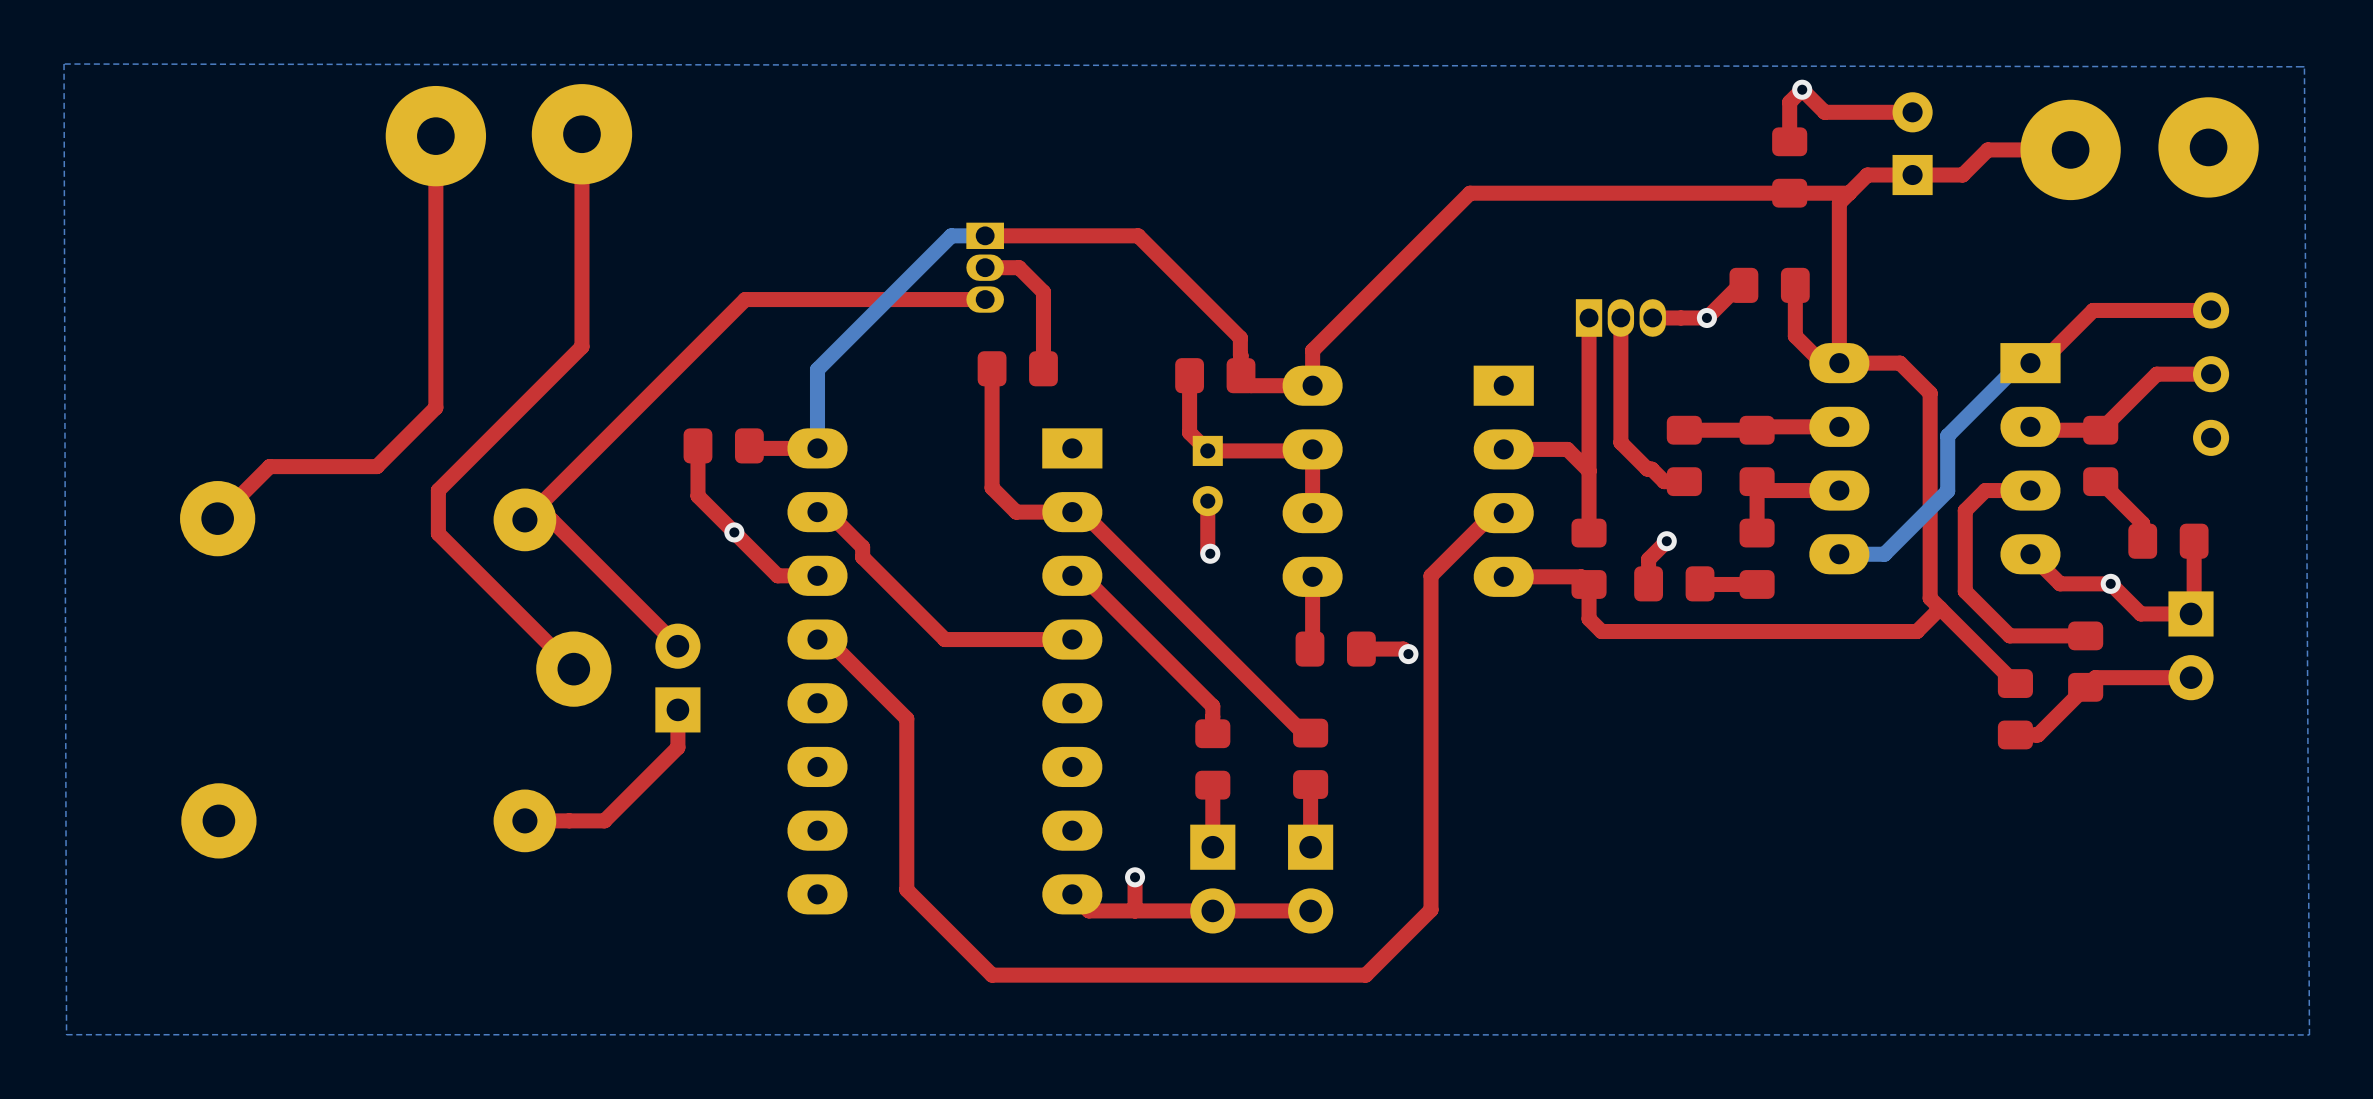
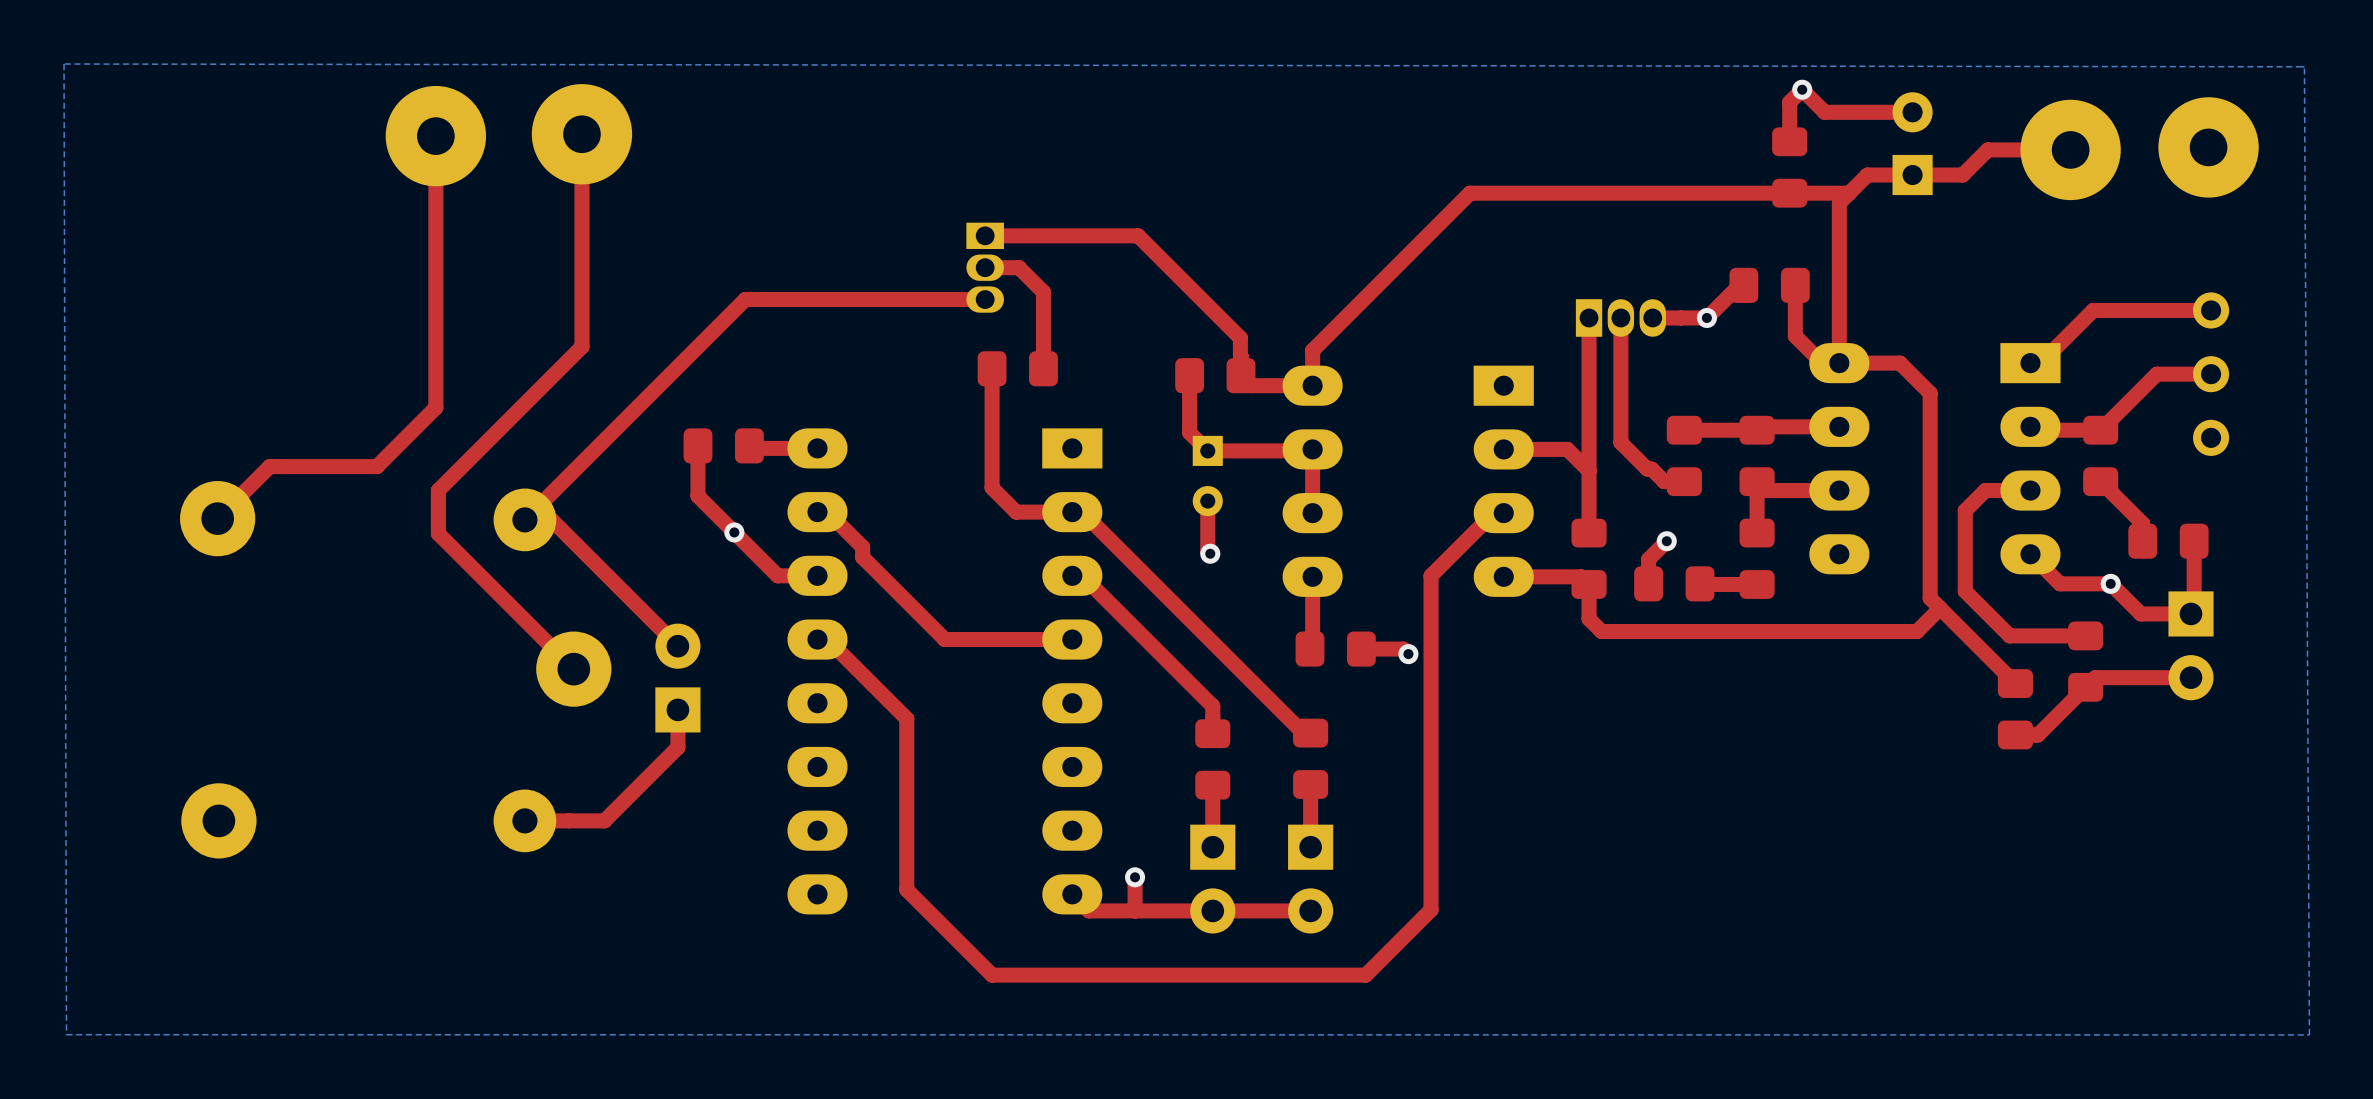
bottom track: (985, 235) (951, 235) (817, 369) (817, 448) -> none
bottom track: (2030, 363) (2020, 363) (1947, 435) (1947, 491) (1884, 554) (1839, 554) -> none

